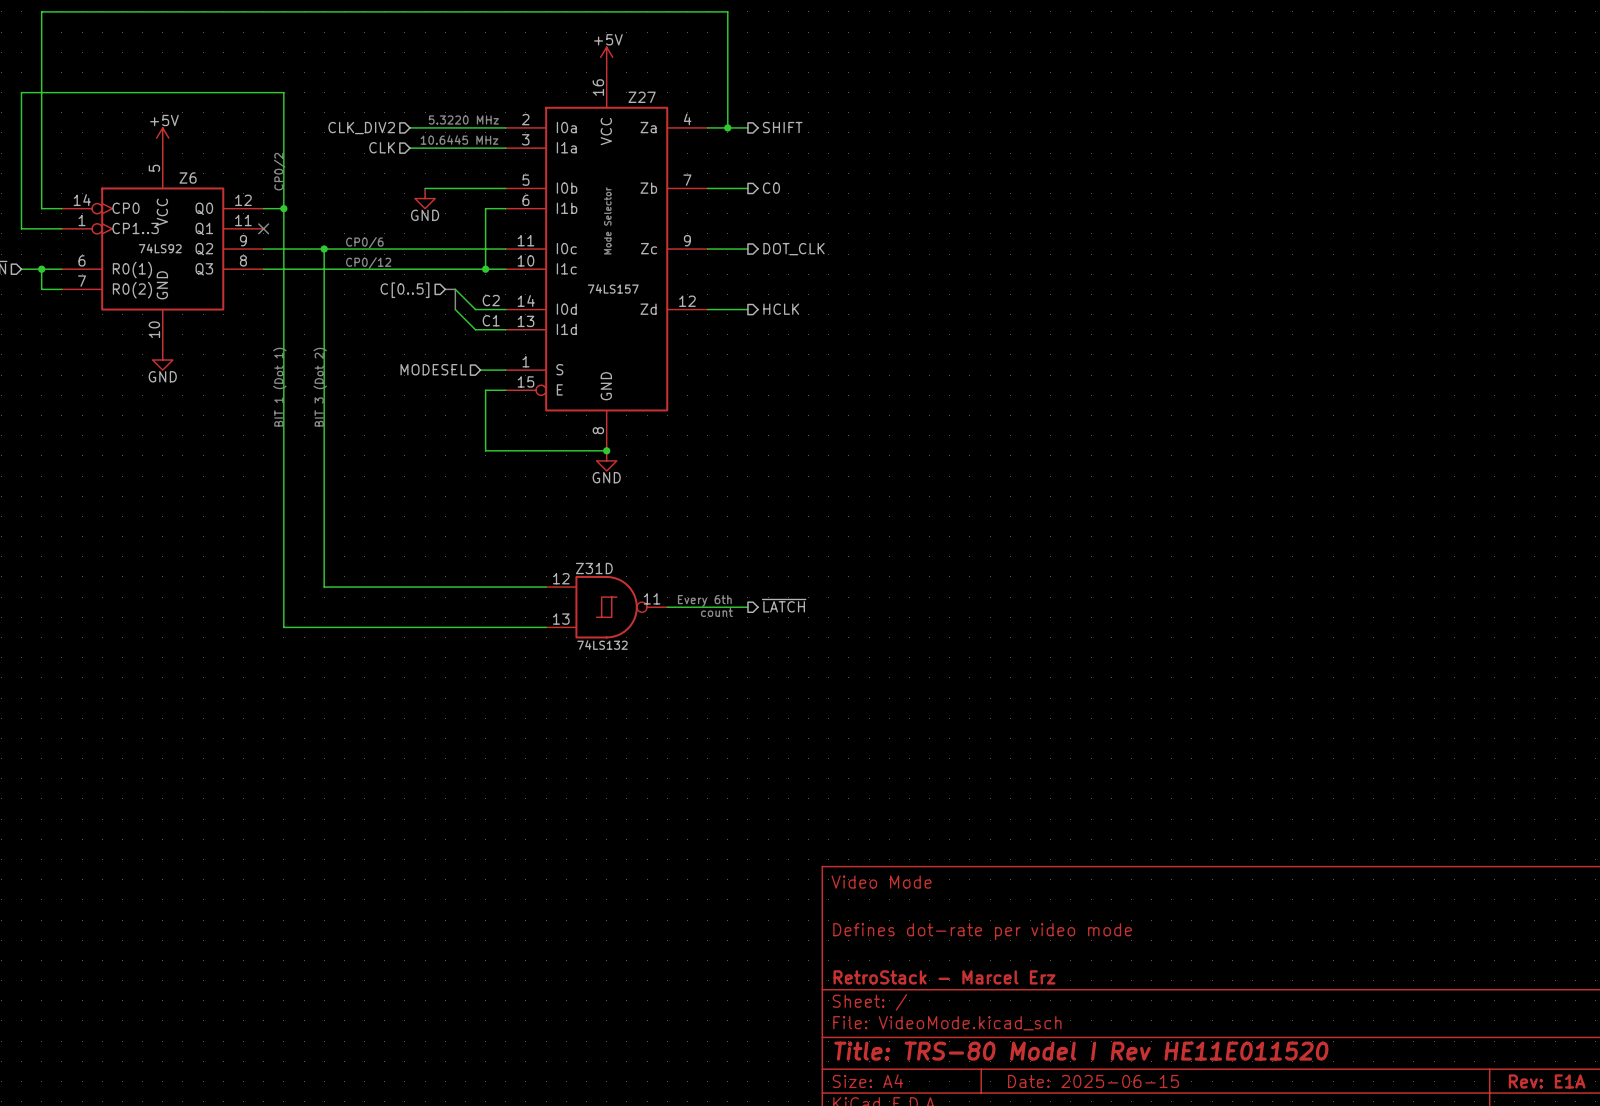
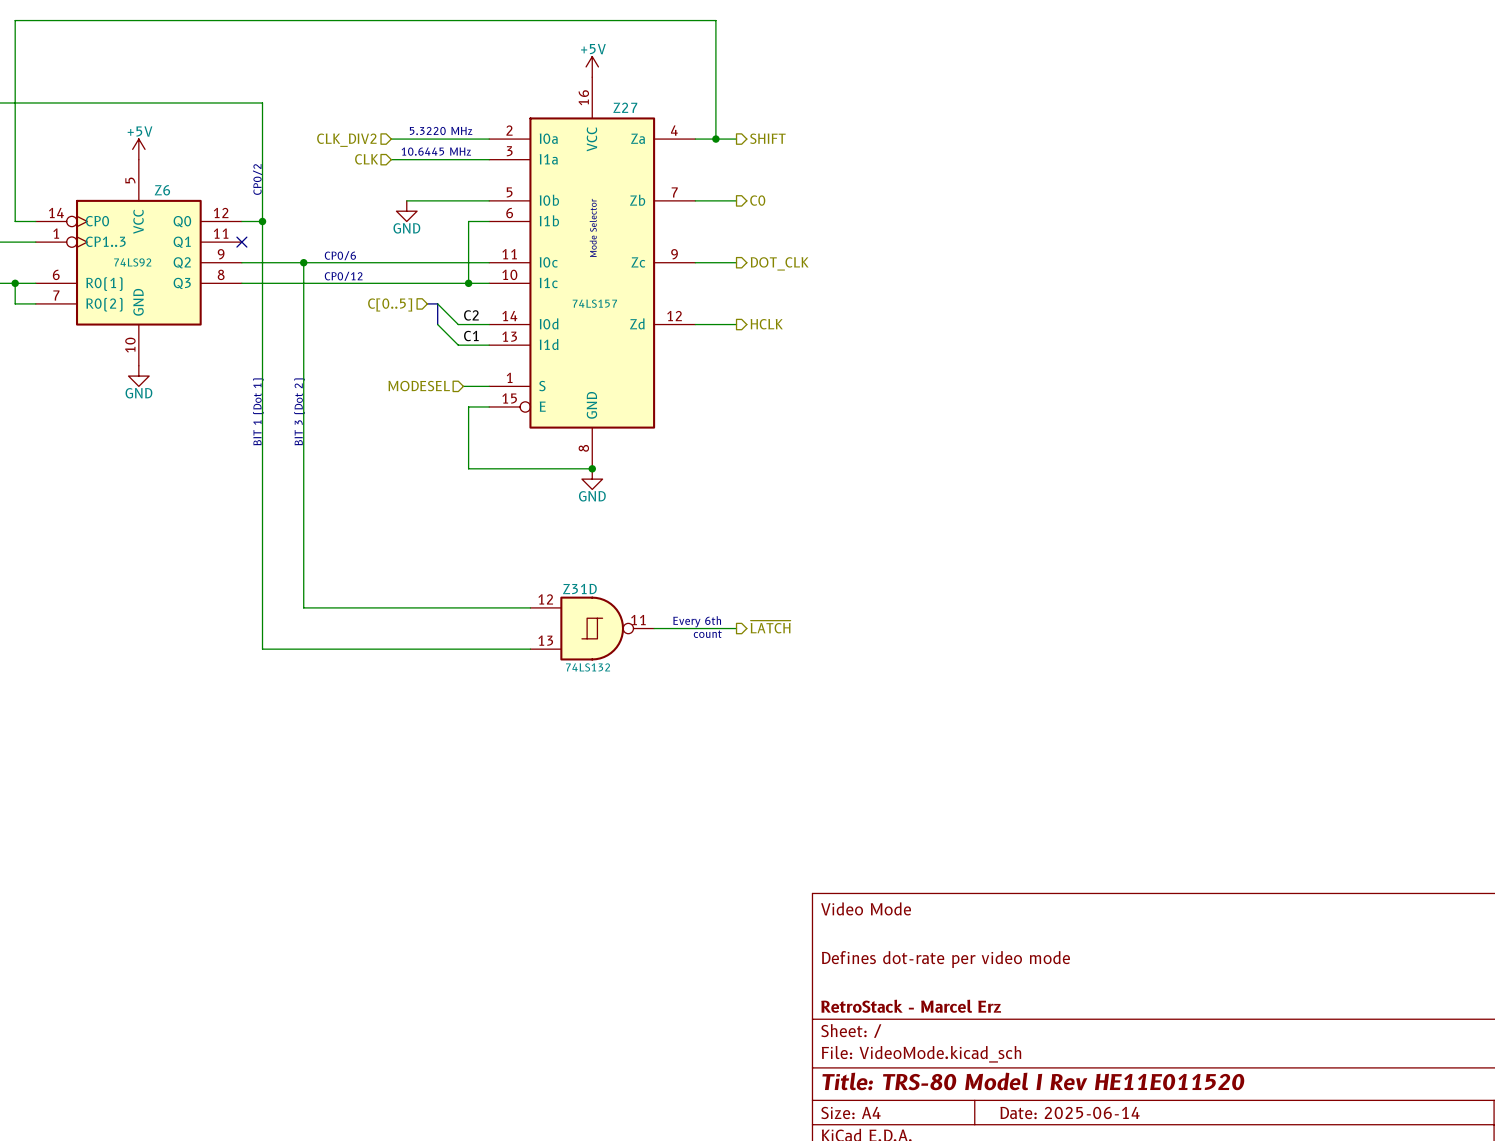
title block: Date: 2025-06-15 (1093, 1081) -> Date: 2025-06-14 (1070, 1112)

